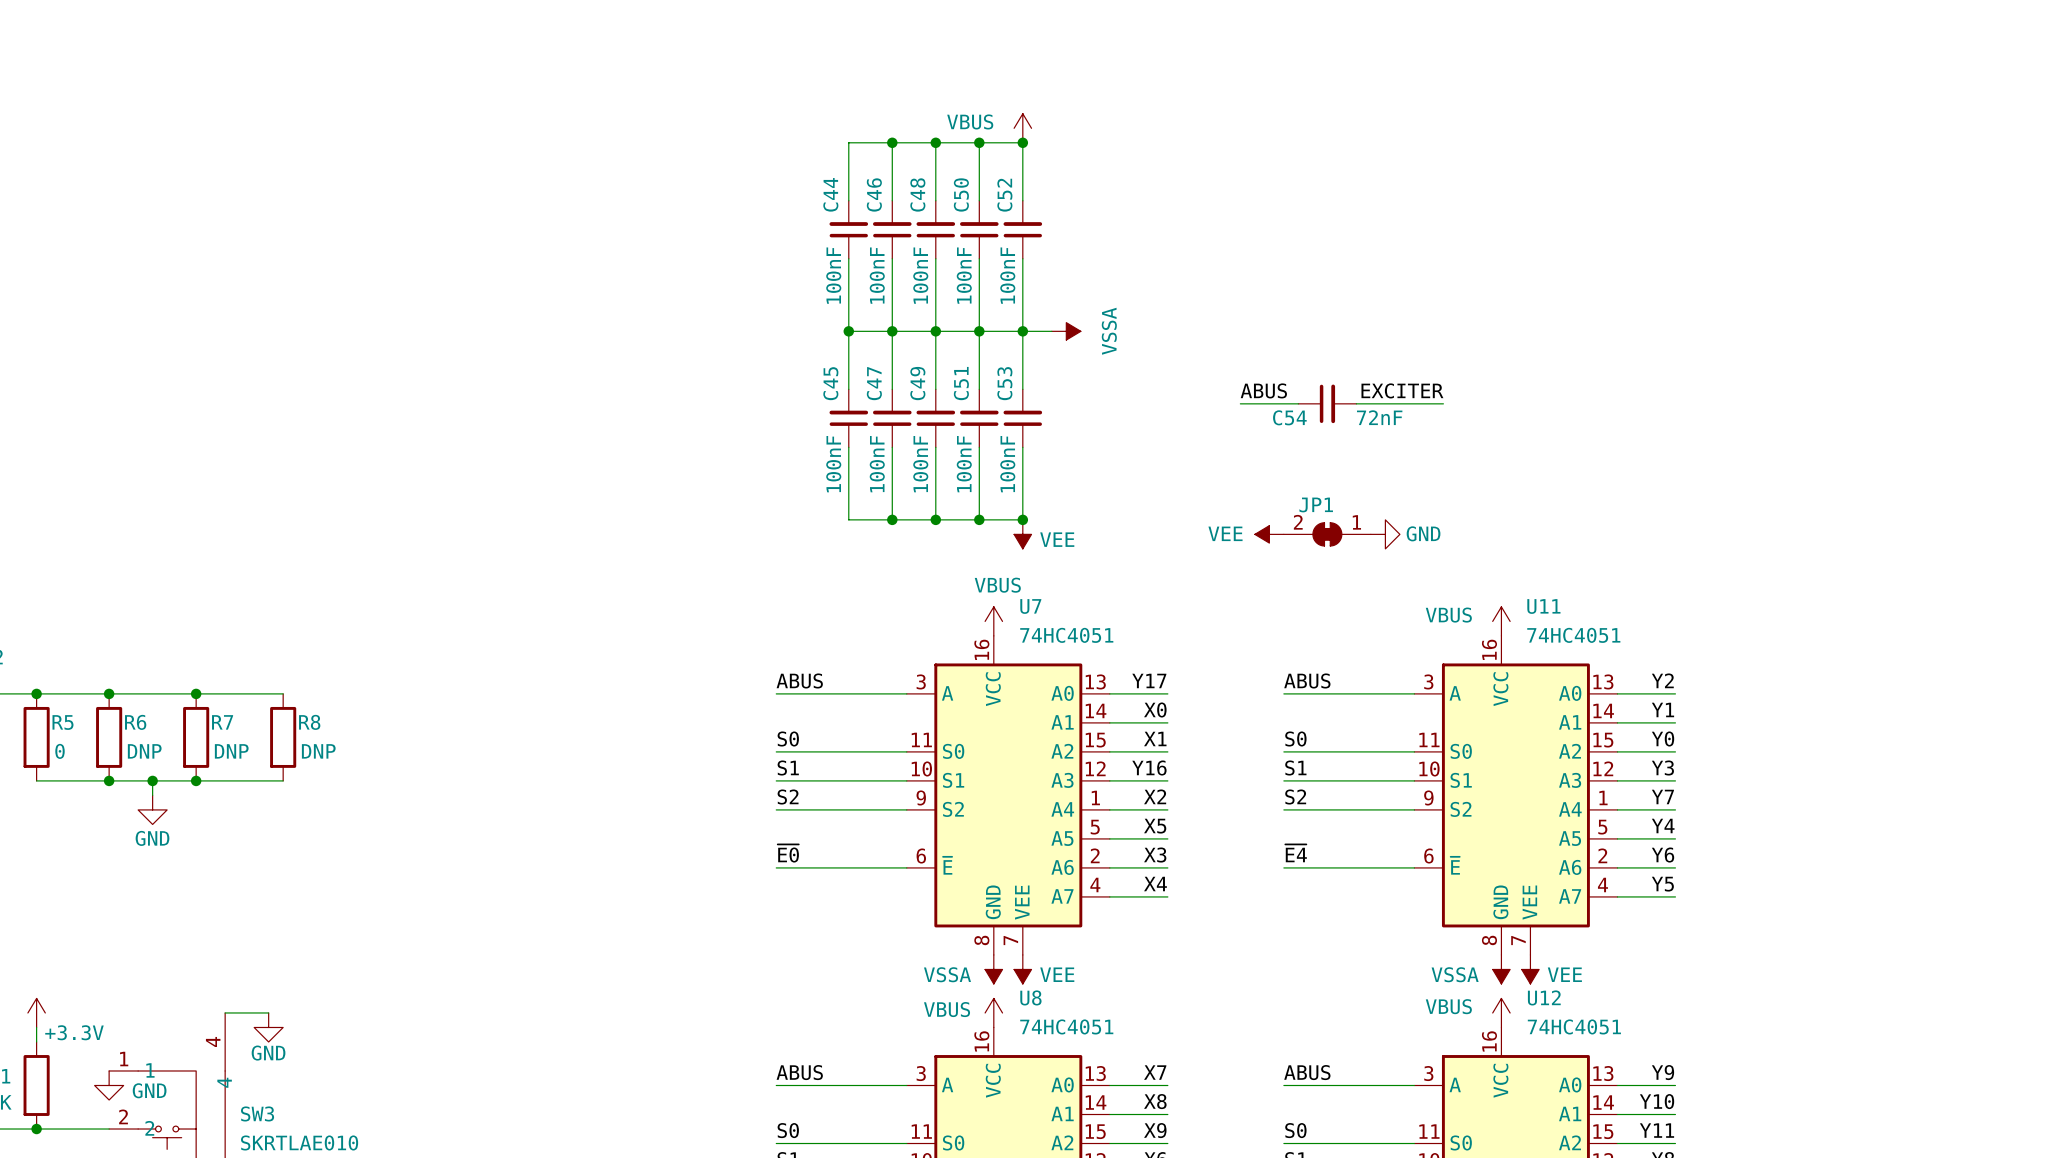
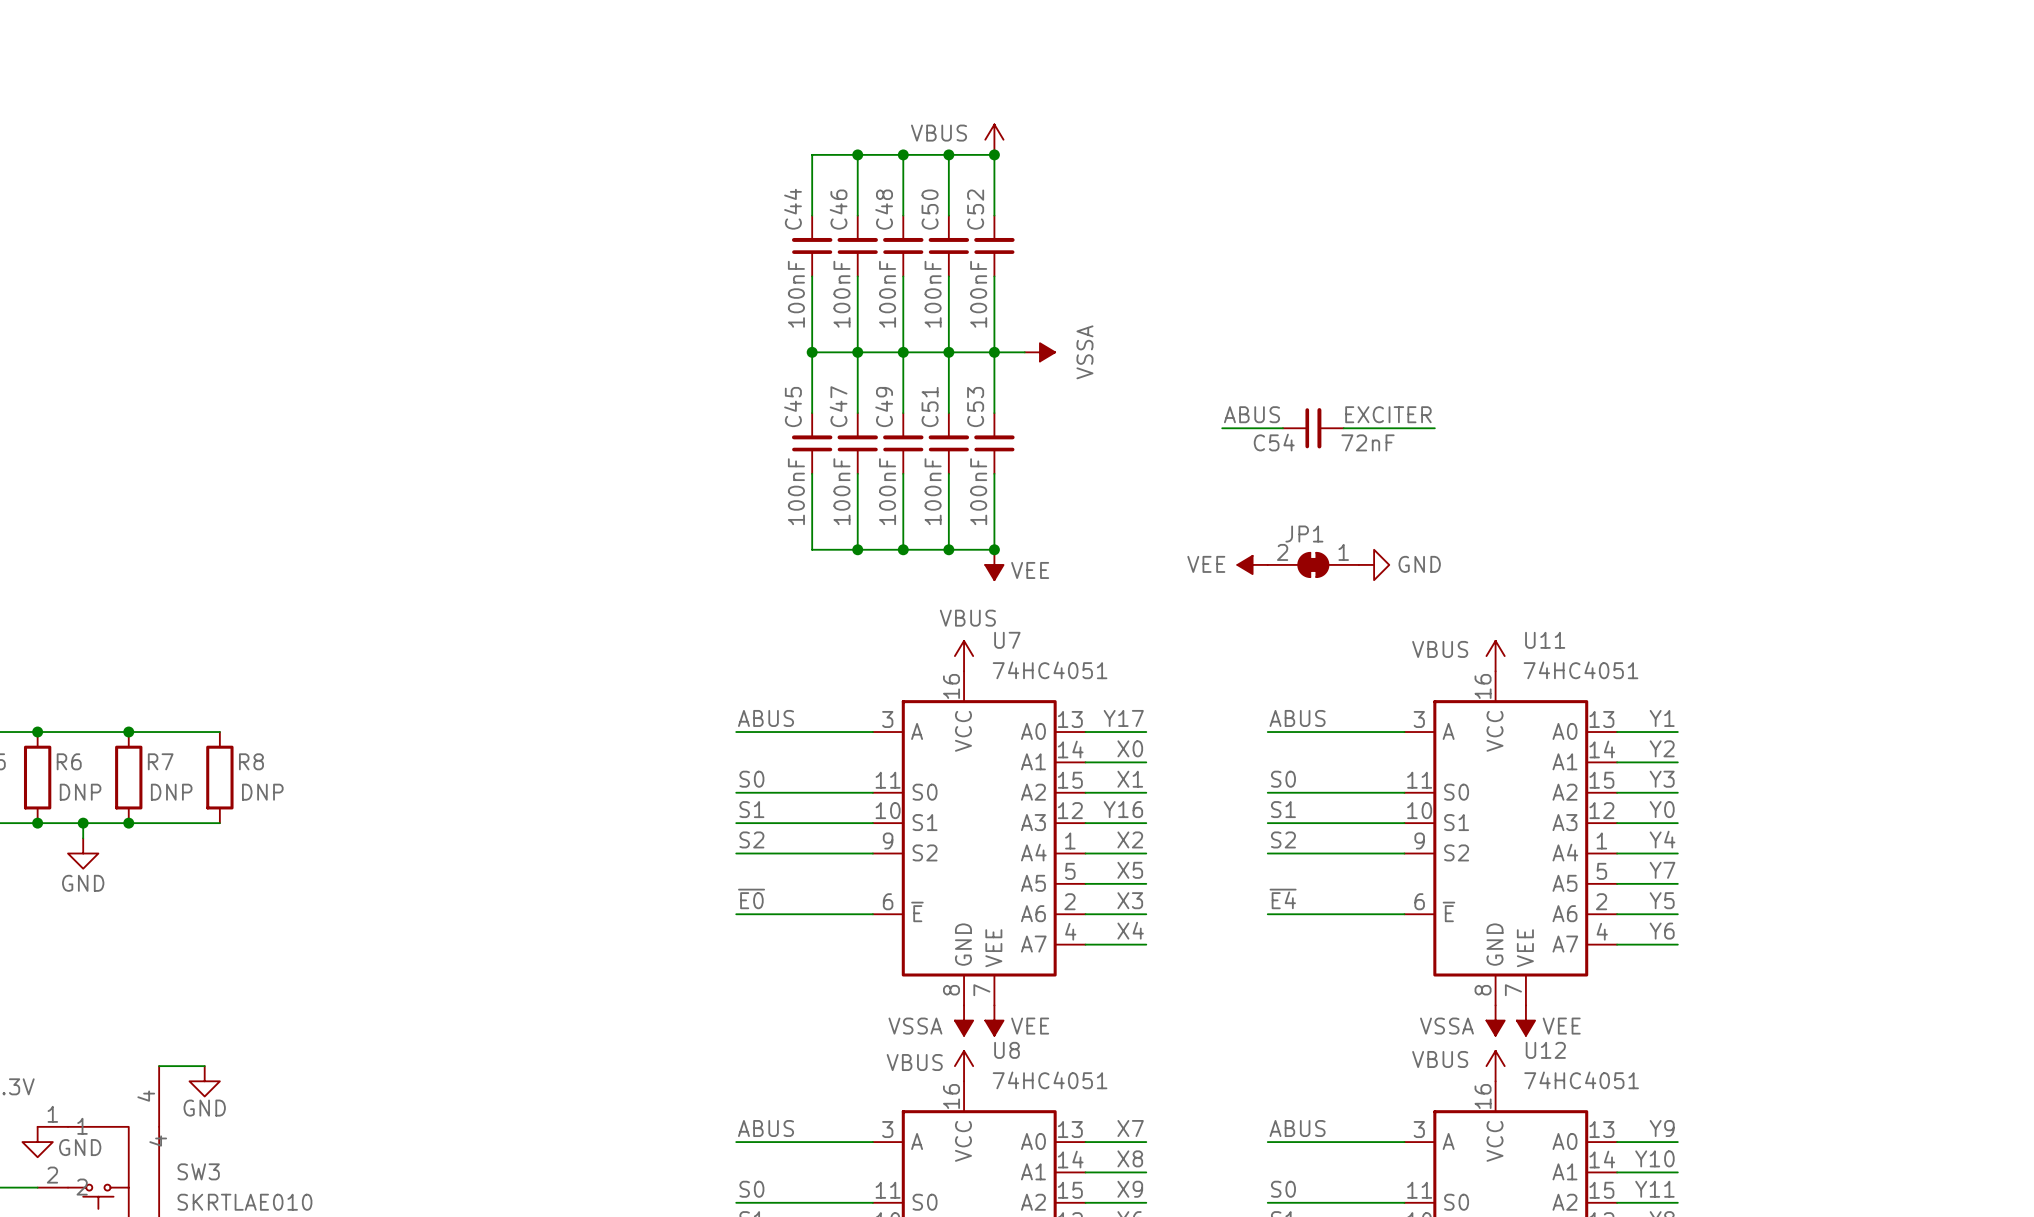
label: Y2 (1662, 680) -> Y1 (1662, 718)
label: Y1 (1662, 709) -> Y2 (1662, 748)
label: Y0 (1663, 738) -> Y3 (1662, 779)
label: Y3 (1662, 768) -> Y0 (1662, 809)
label: Y7 (1662, 796) -> Y4 (1662, 839)
label: Y4 (1663, 826) -> Y7 (1662, 870)
label: Y6 (1663, 855) -> Y5 (1662, 900)
label: Y5 (1662, 884) -> Y6 (1662, 931)

